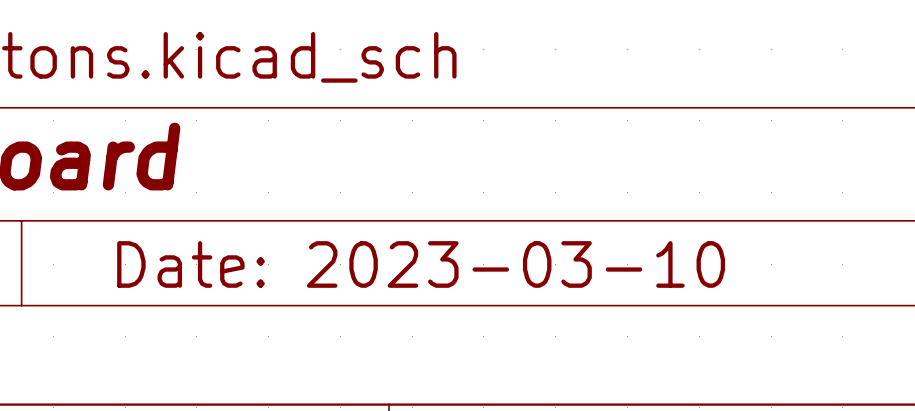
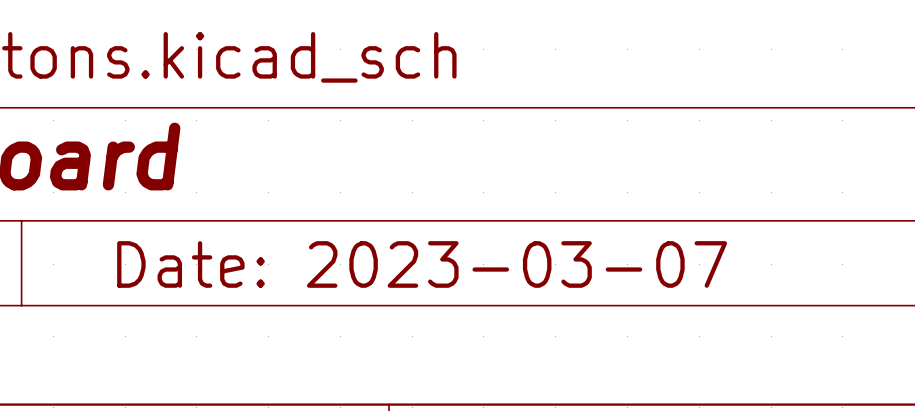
title block: Date: 2023-03-10 (421, 264) -> Date: 2023-03-07 (422, 264)

